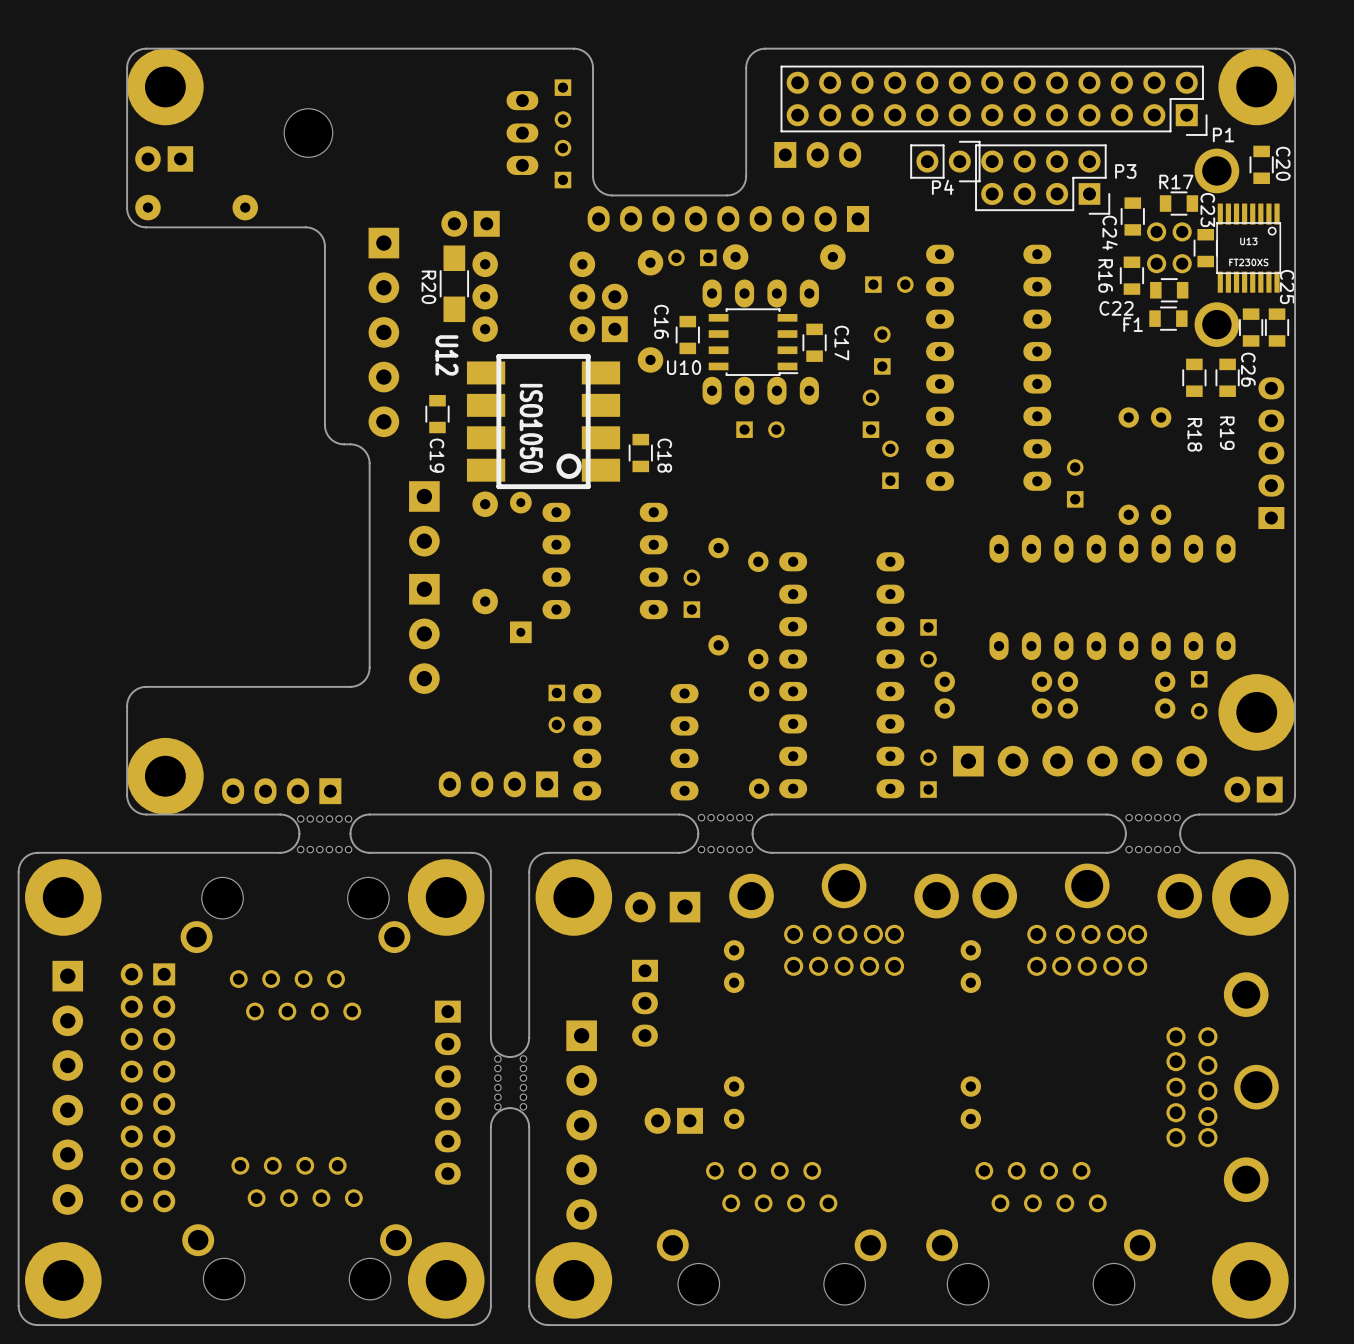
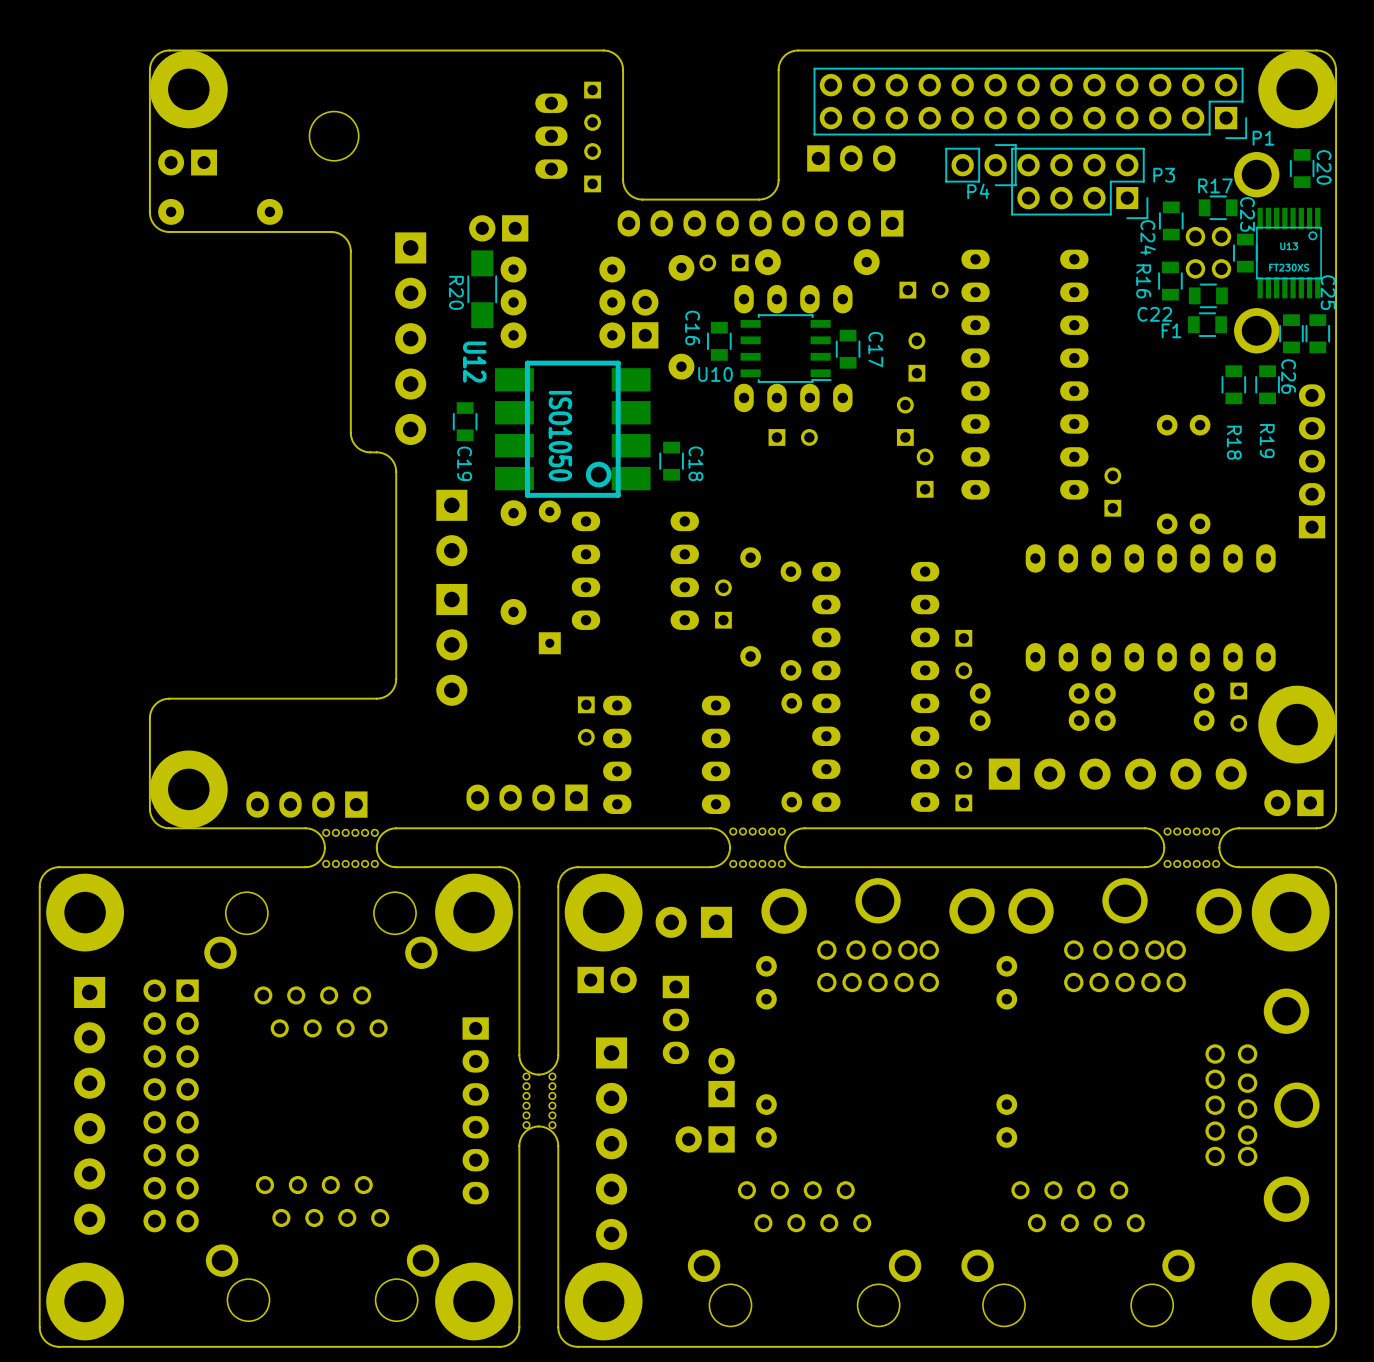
part: none -> (607, 979)
part: none -> (721, 1077)

